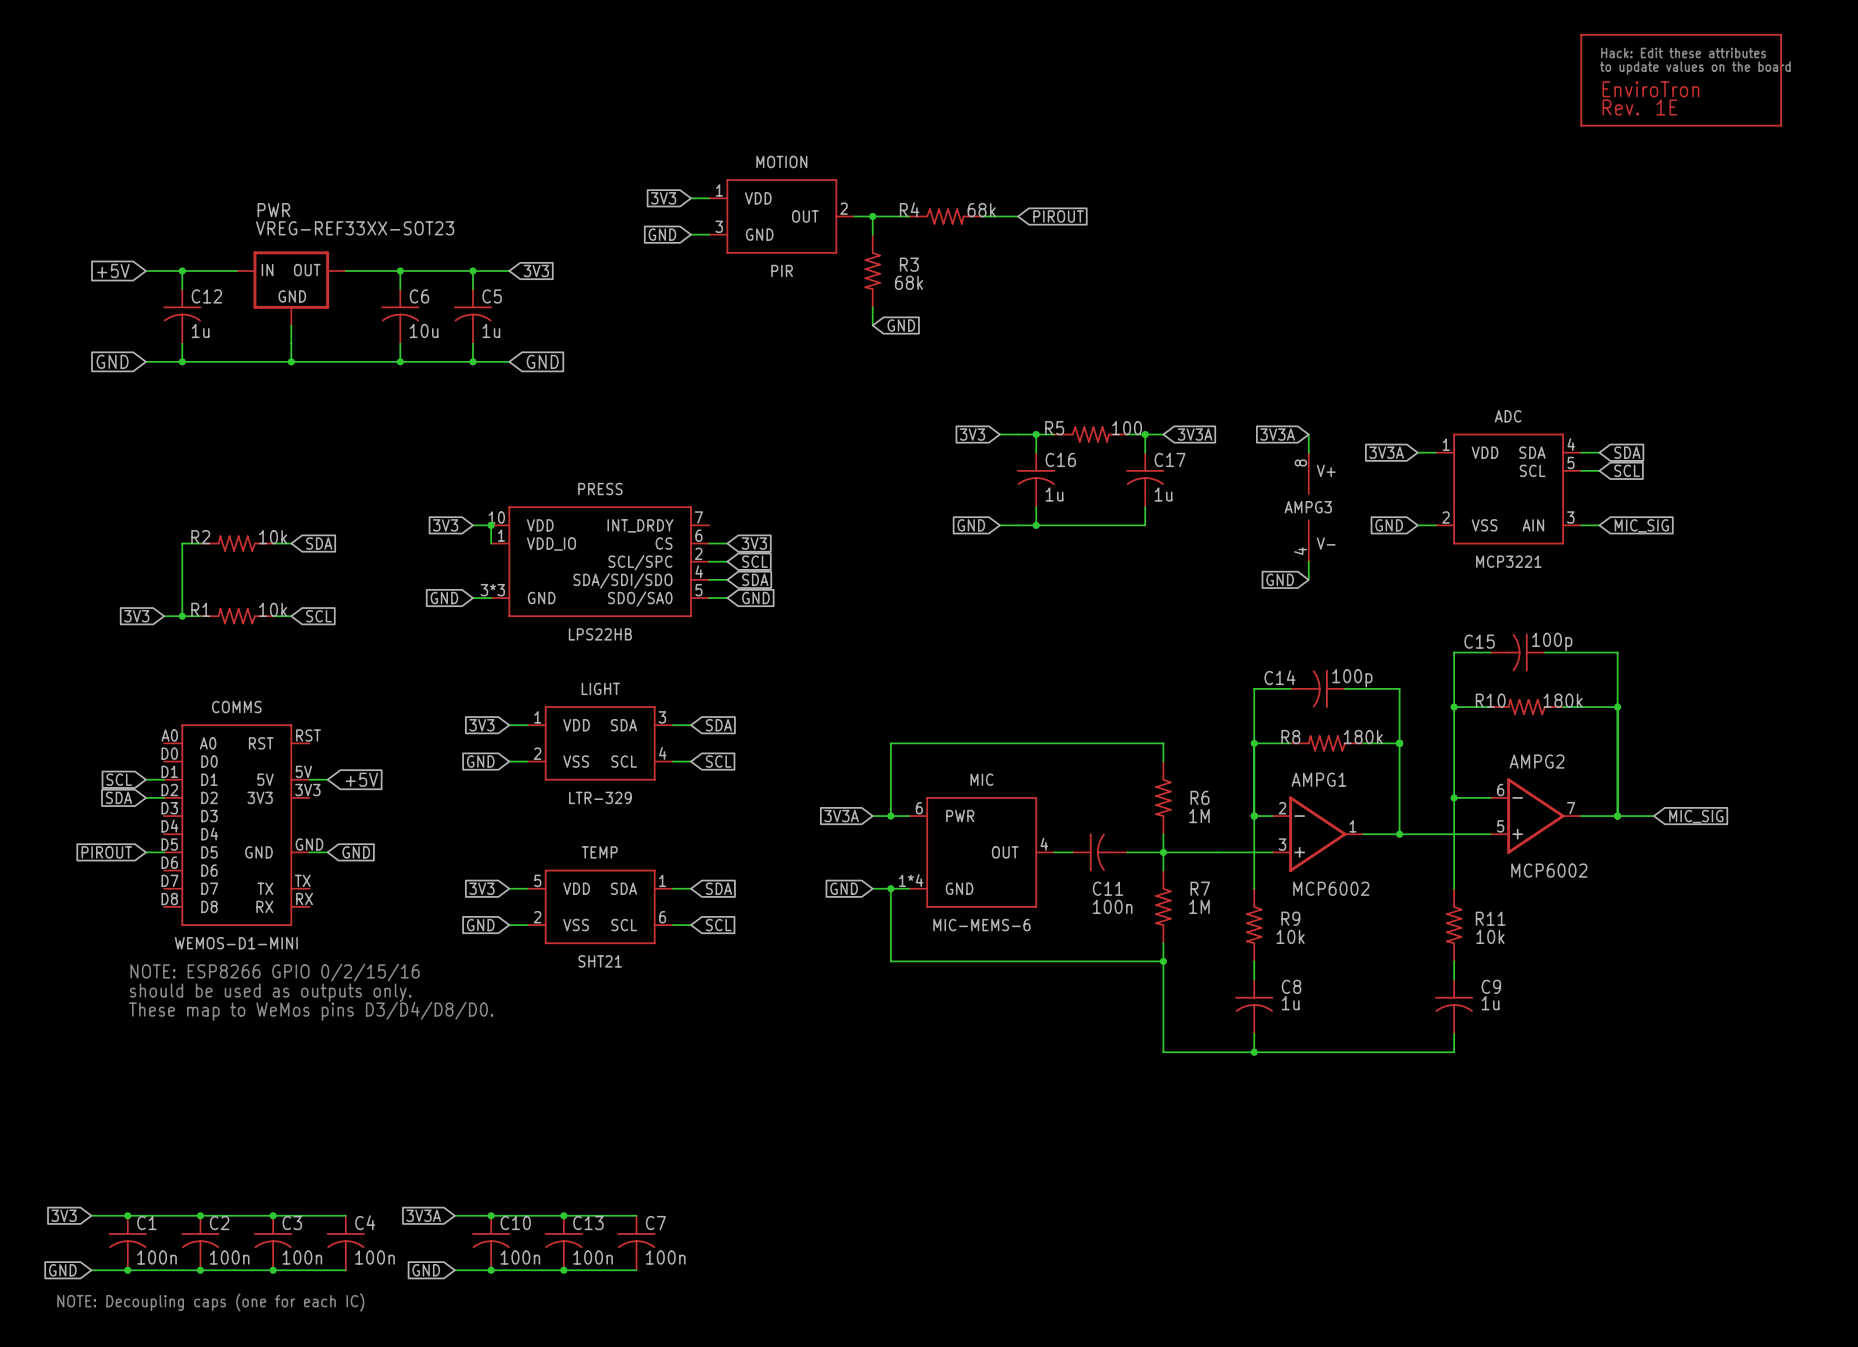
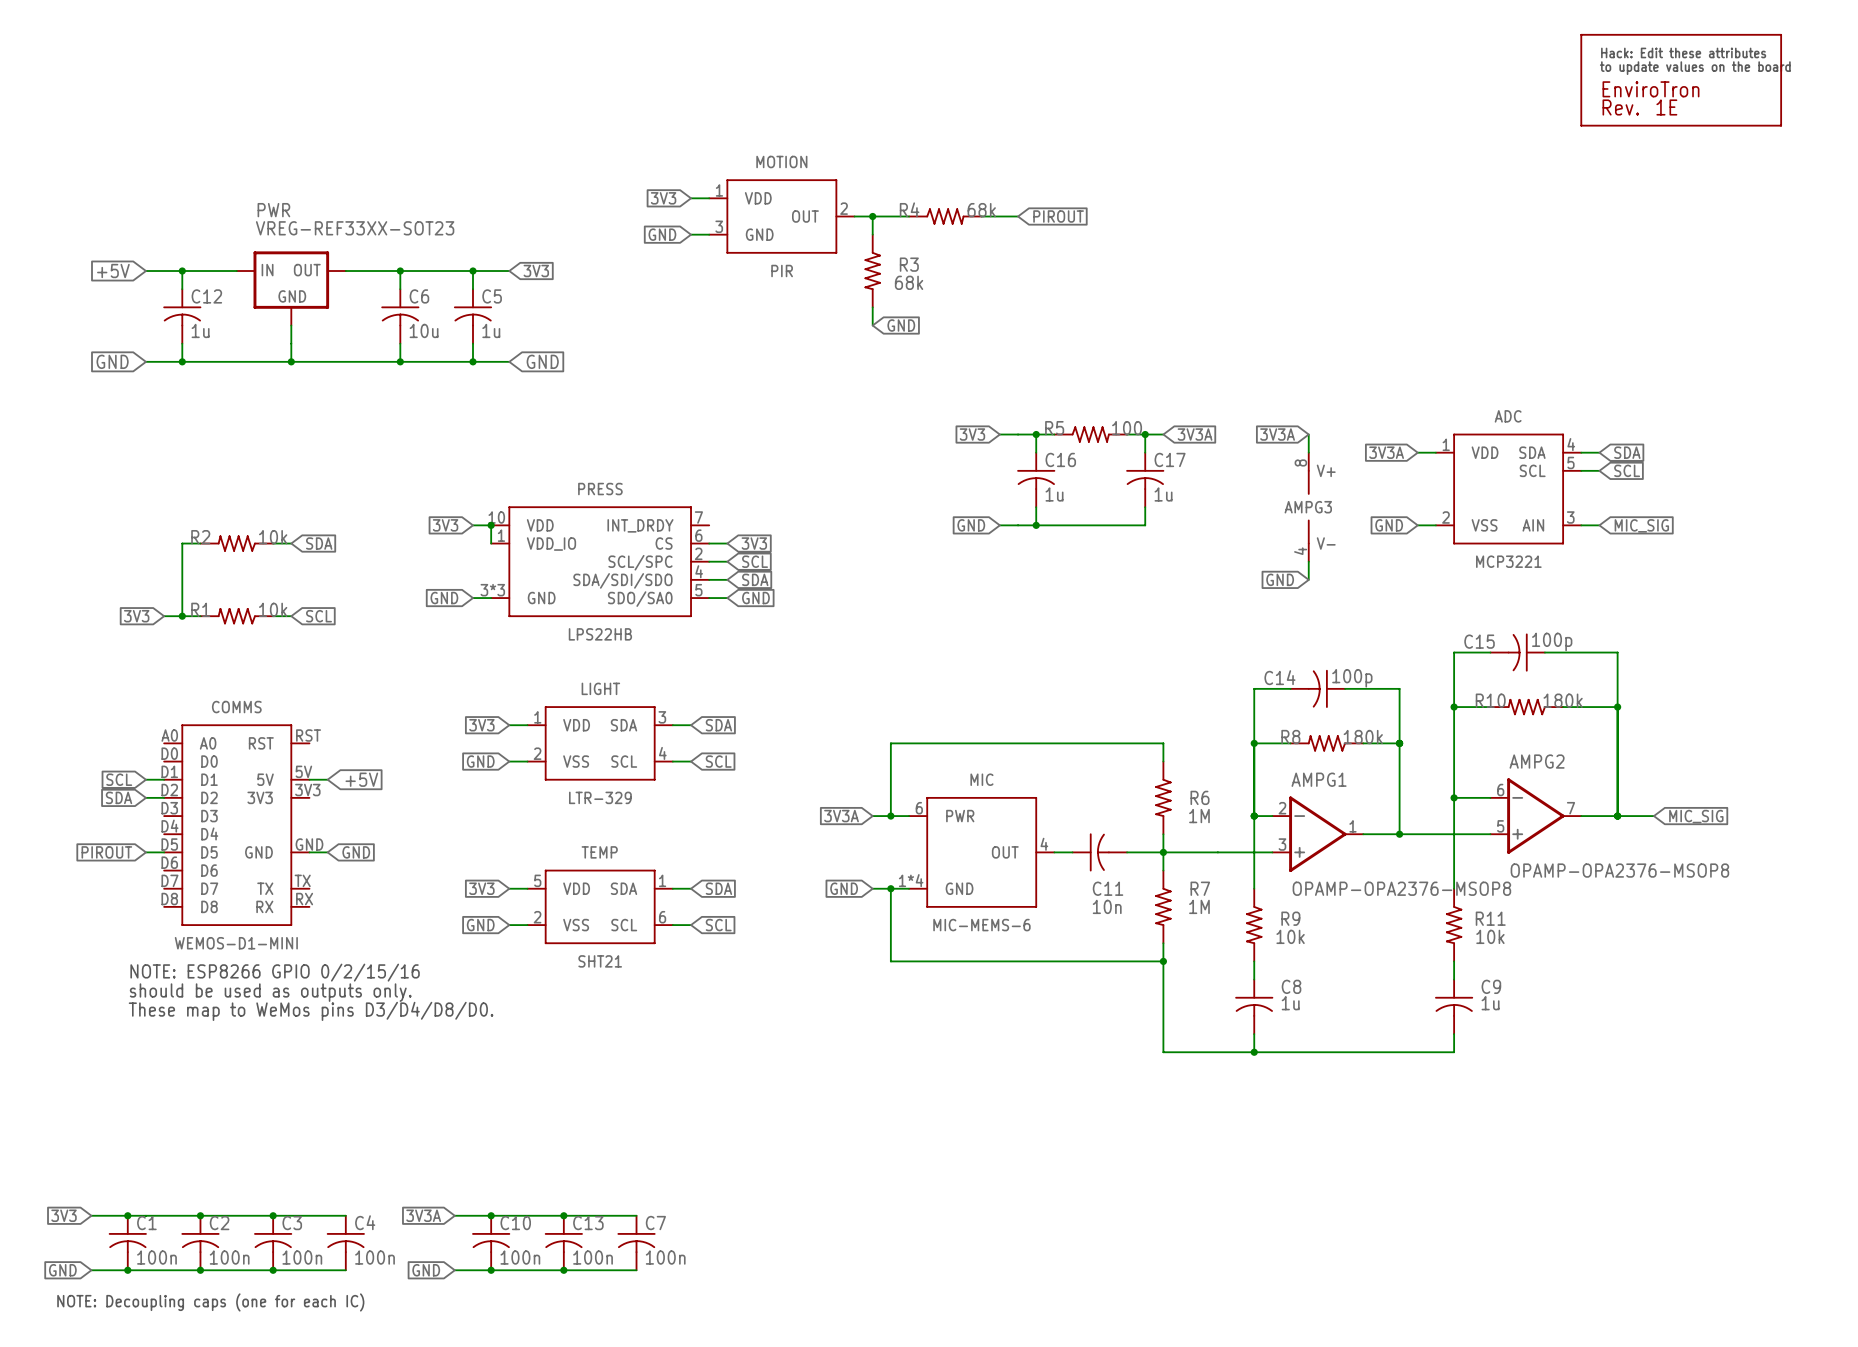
AMPG2 value: MCP6002 (1549, 870) -> OPAMP-OPA2376-MSOP8 (1619, 870)
AMPG1 value: MCP6002 (1331, 888) -> OPAMP-OPA2376-MSOP8 (1401, 888)
C11 value: 100n (1112, 906) -> 10n (1107, 906)

